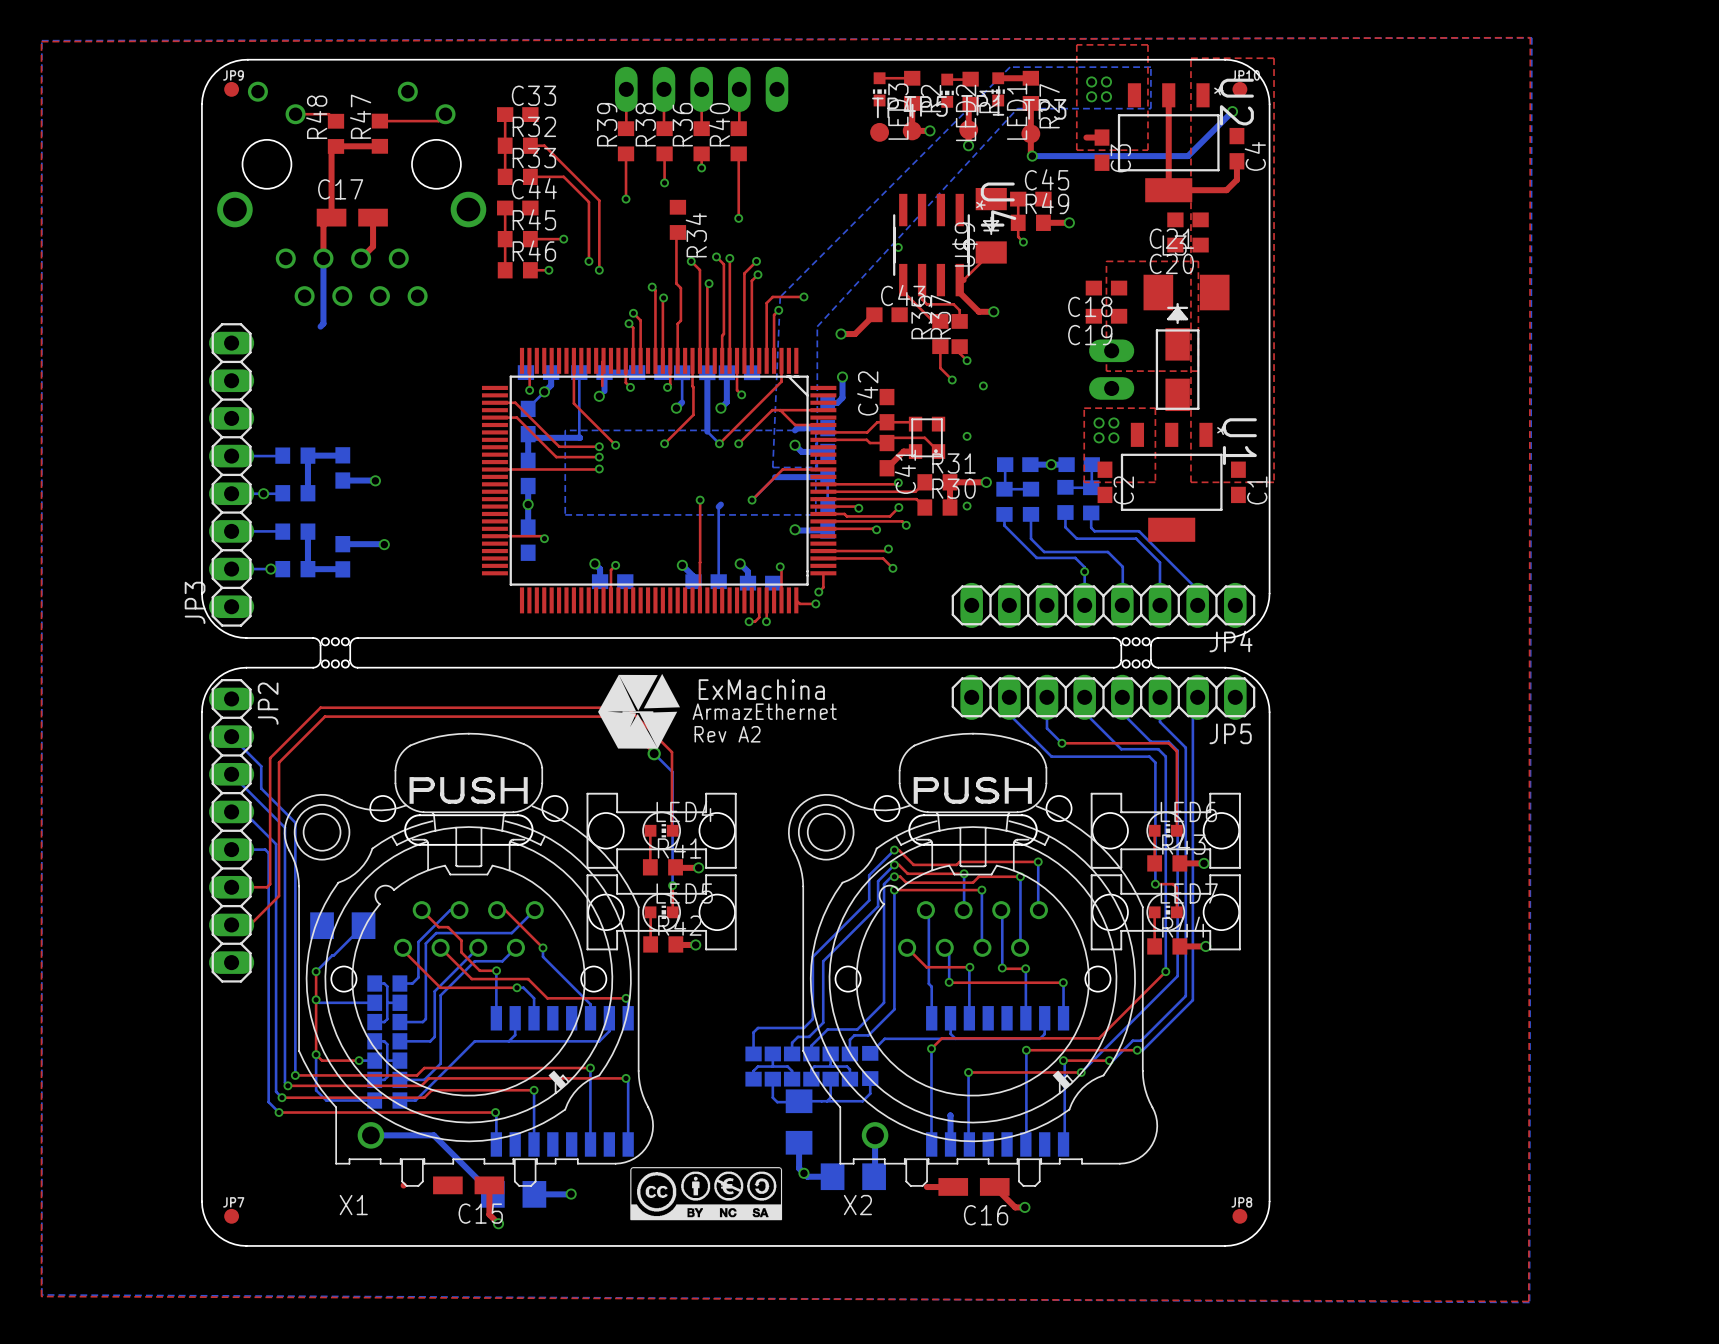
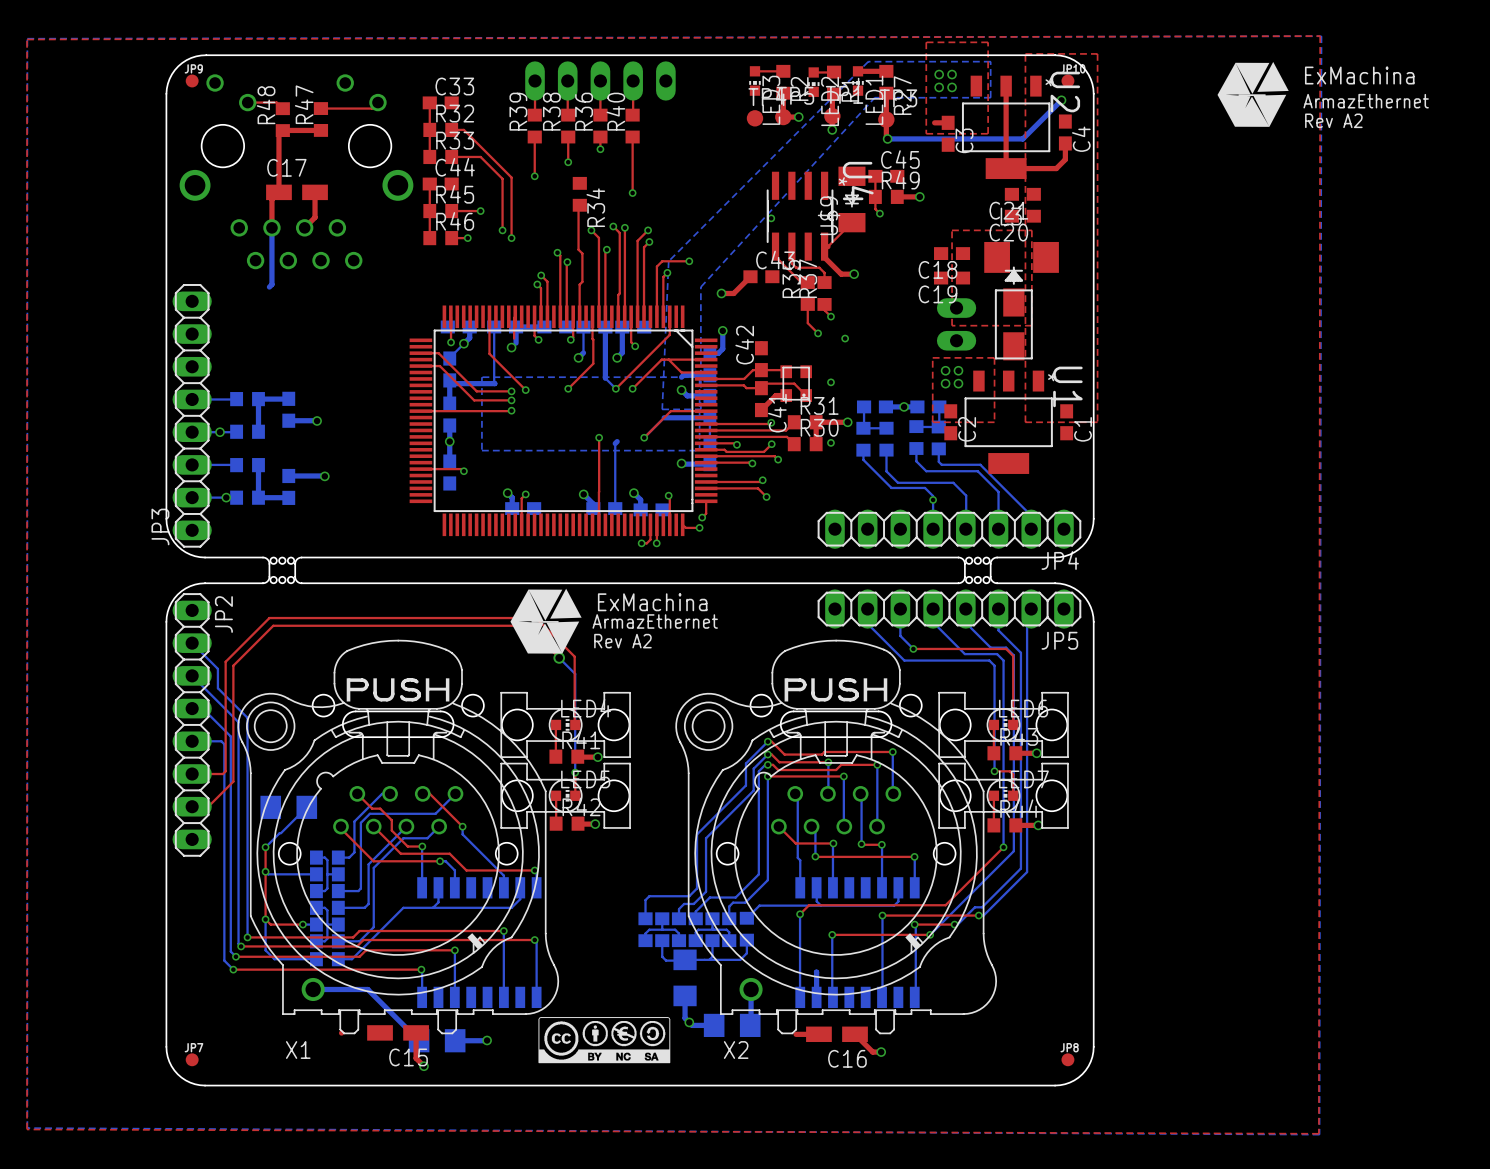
drawing: none -> [1217, 61, 1289, 127]
text: none -> ArmazEthernet (1366, 101)
text: none -> Rev A2 (1333, 120)

